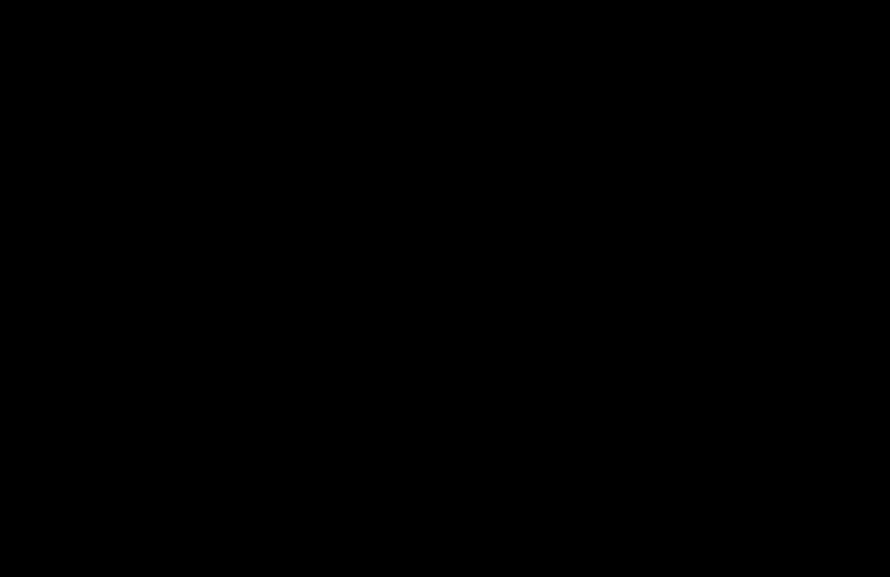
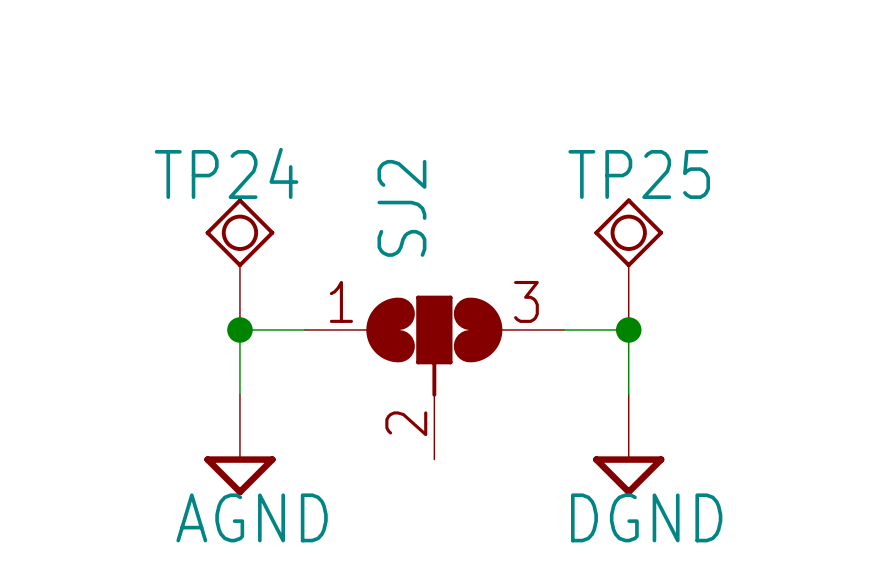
TP24: none -> (239, 264)
TP25: none -> (628, 264)
junction: none -> (239, 329)
wire: none -> (304, 329) (239, 329) (239, 394)
wire: none -> (563, 329) (628, 329) (628, 394)
junction: none -> (628, 329)
SJ2: none -> (434, 377)
power symbol: none -> AGND (239, 445)
power symbol: none -> DGND (628, 445)

